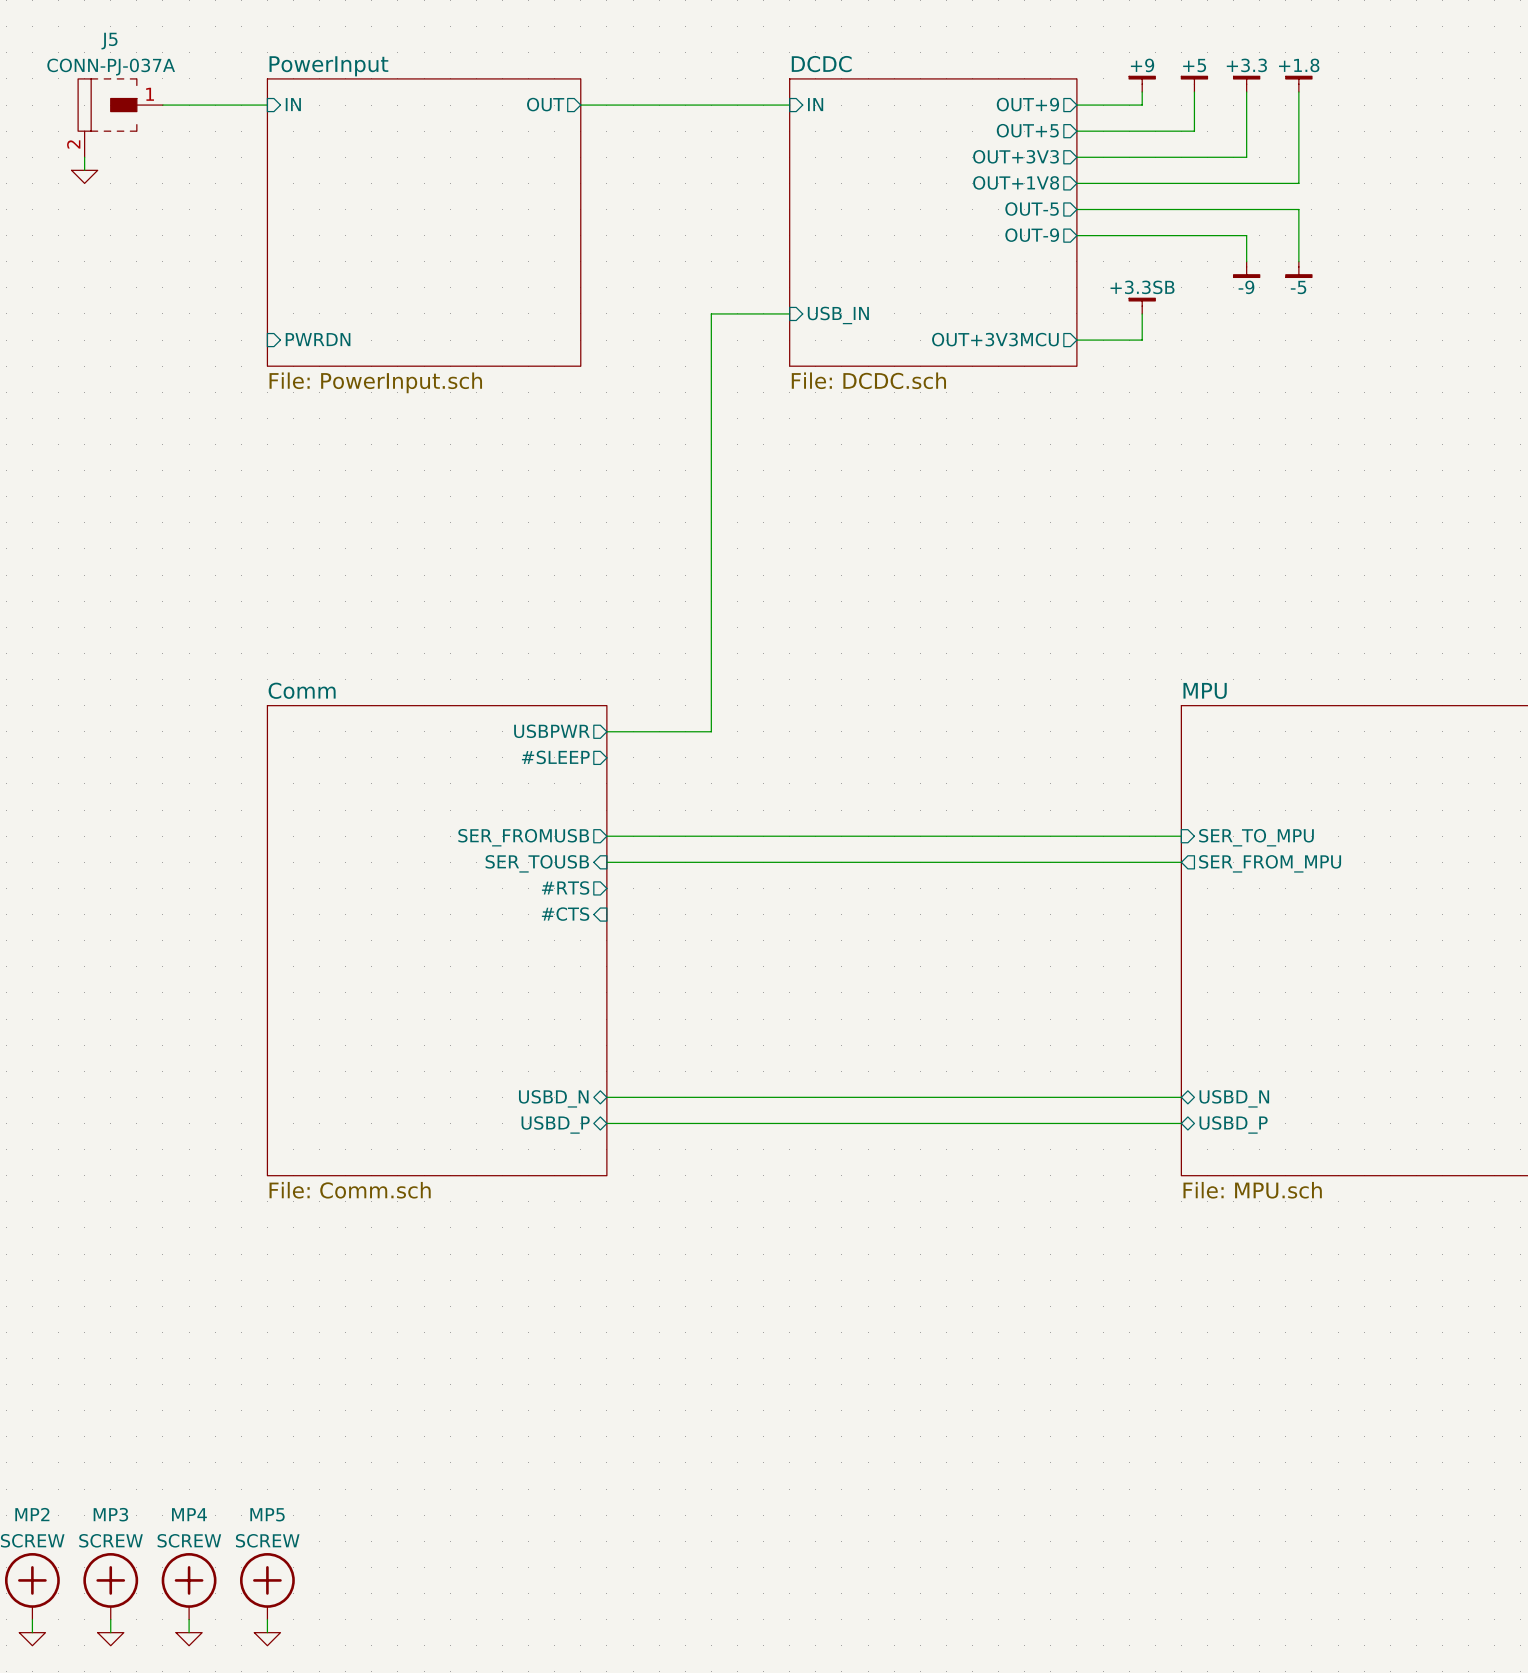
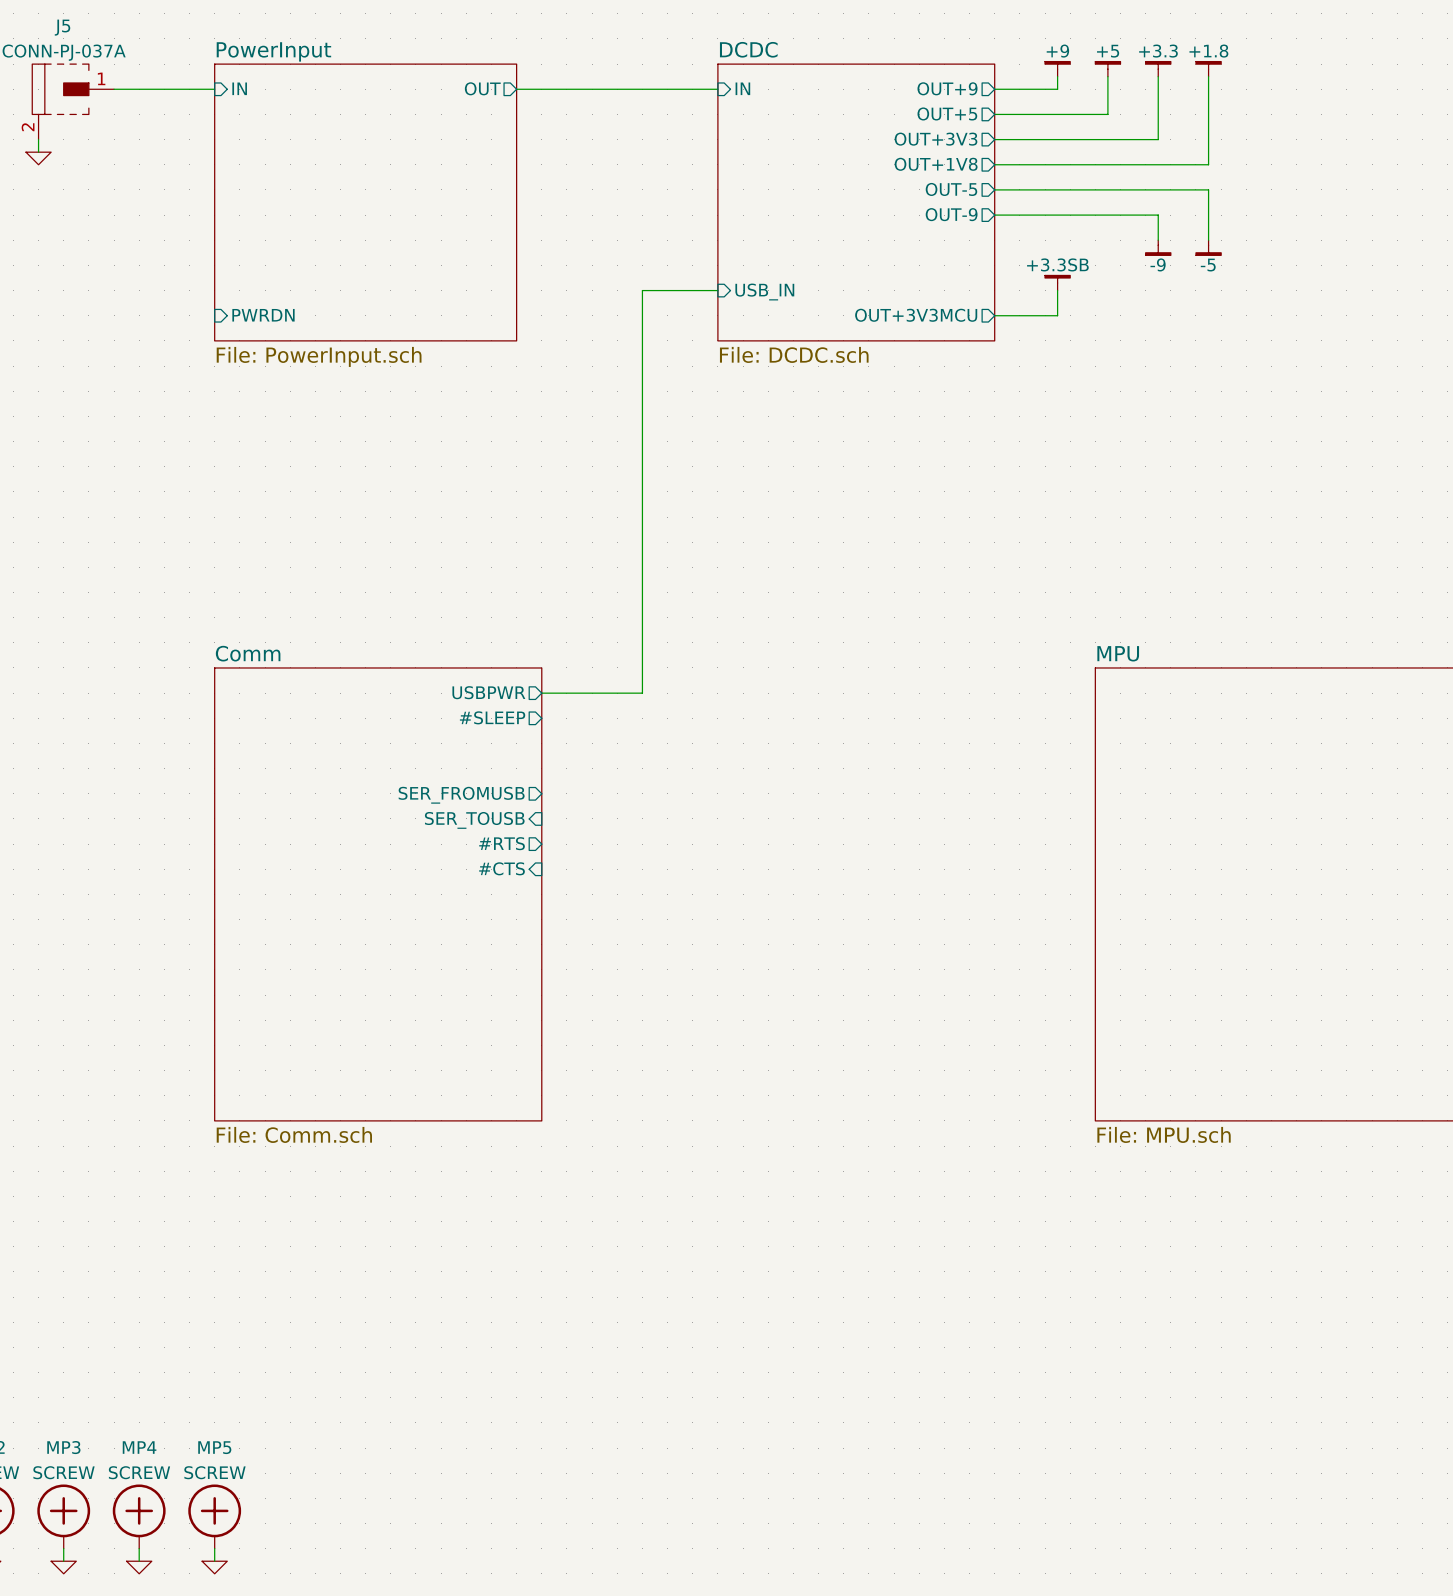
wire: (606, 836) (1181, 836) -> none
sheet pin: SER_TO_MPU (1256, 837) -> none
wire: (606, 862) (1181, 862) -> none
sheet pin: SER_FROM_MPU (1270, 863) -> none
wire: (606, 1097) (1181, 1097) -> none
sheet pin: USBD_N (553, 1098) -> none
sheet pin: USBD_N (1234, 1098) -> none
wire: (606, 1123) (1181, 1123) -> none
sheet pin: USBD_P (555, 1124) -> none
sheet pin: USBD_P (1233, 1124) -> none

